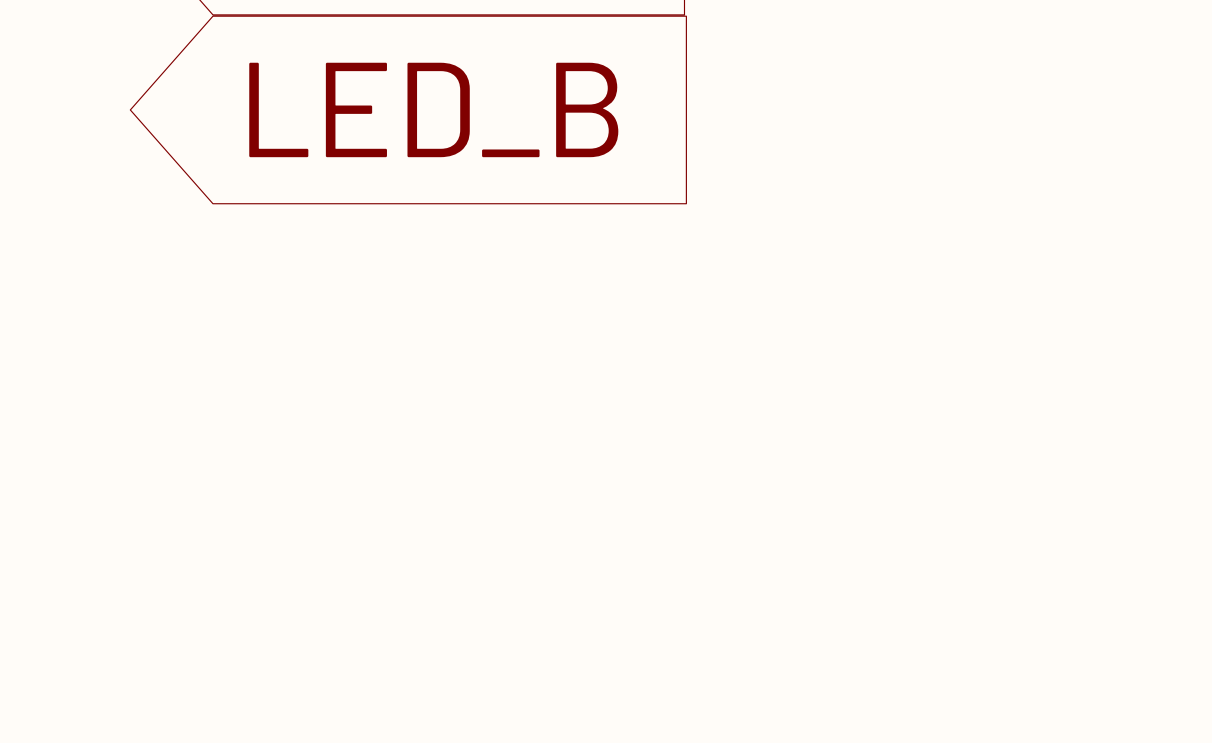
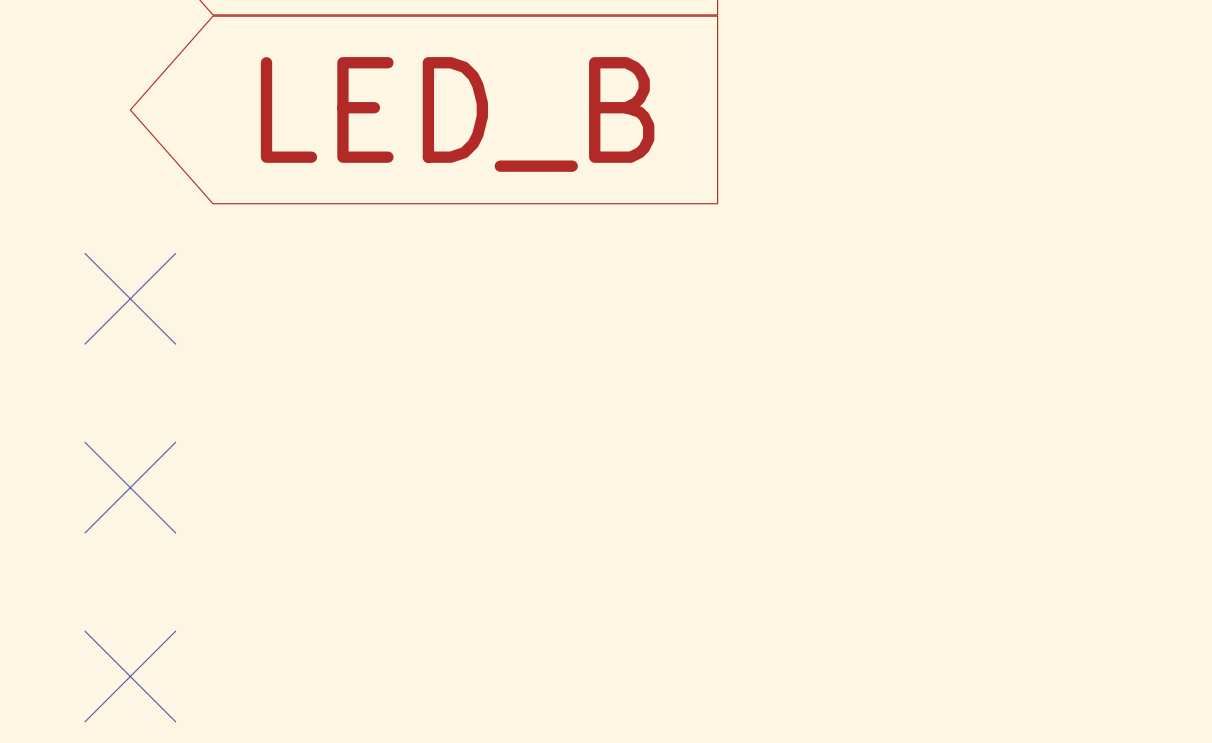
no-connect mark: none -> (130, 298)
no-connect mark: none -> (130, 487)
no-connect mark: none -> (130, 676)

